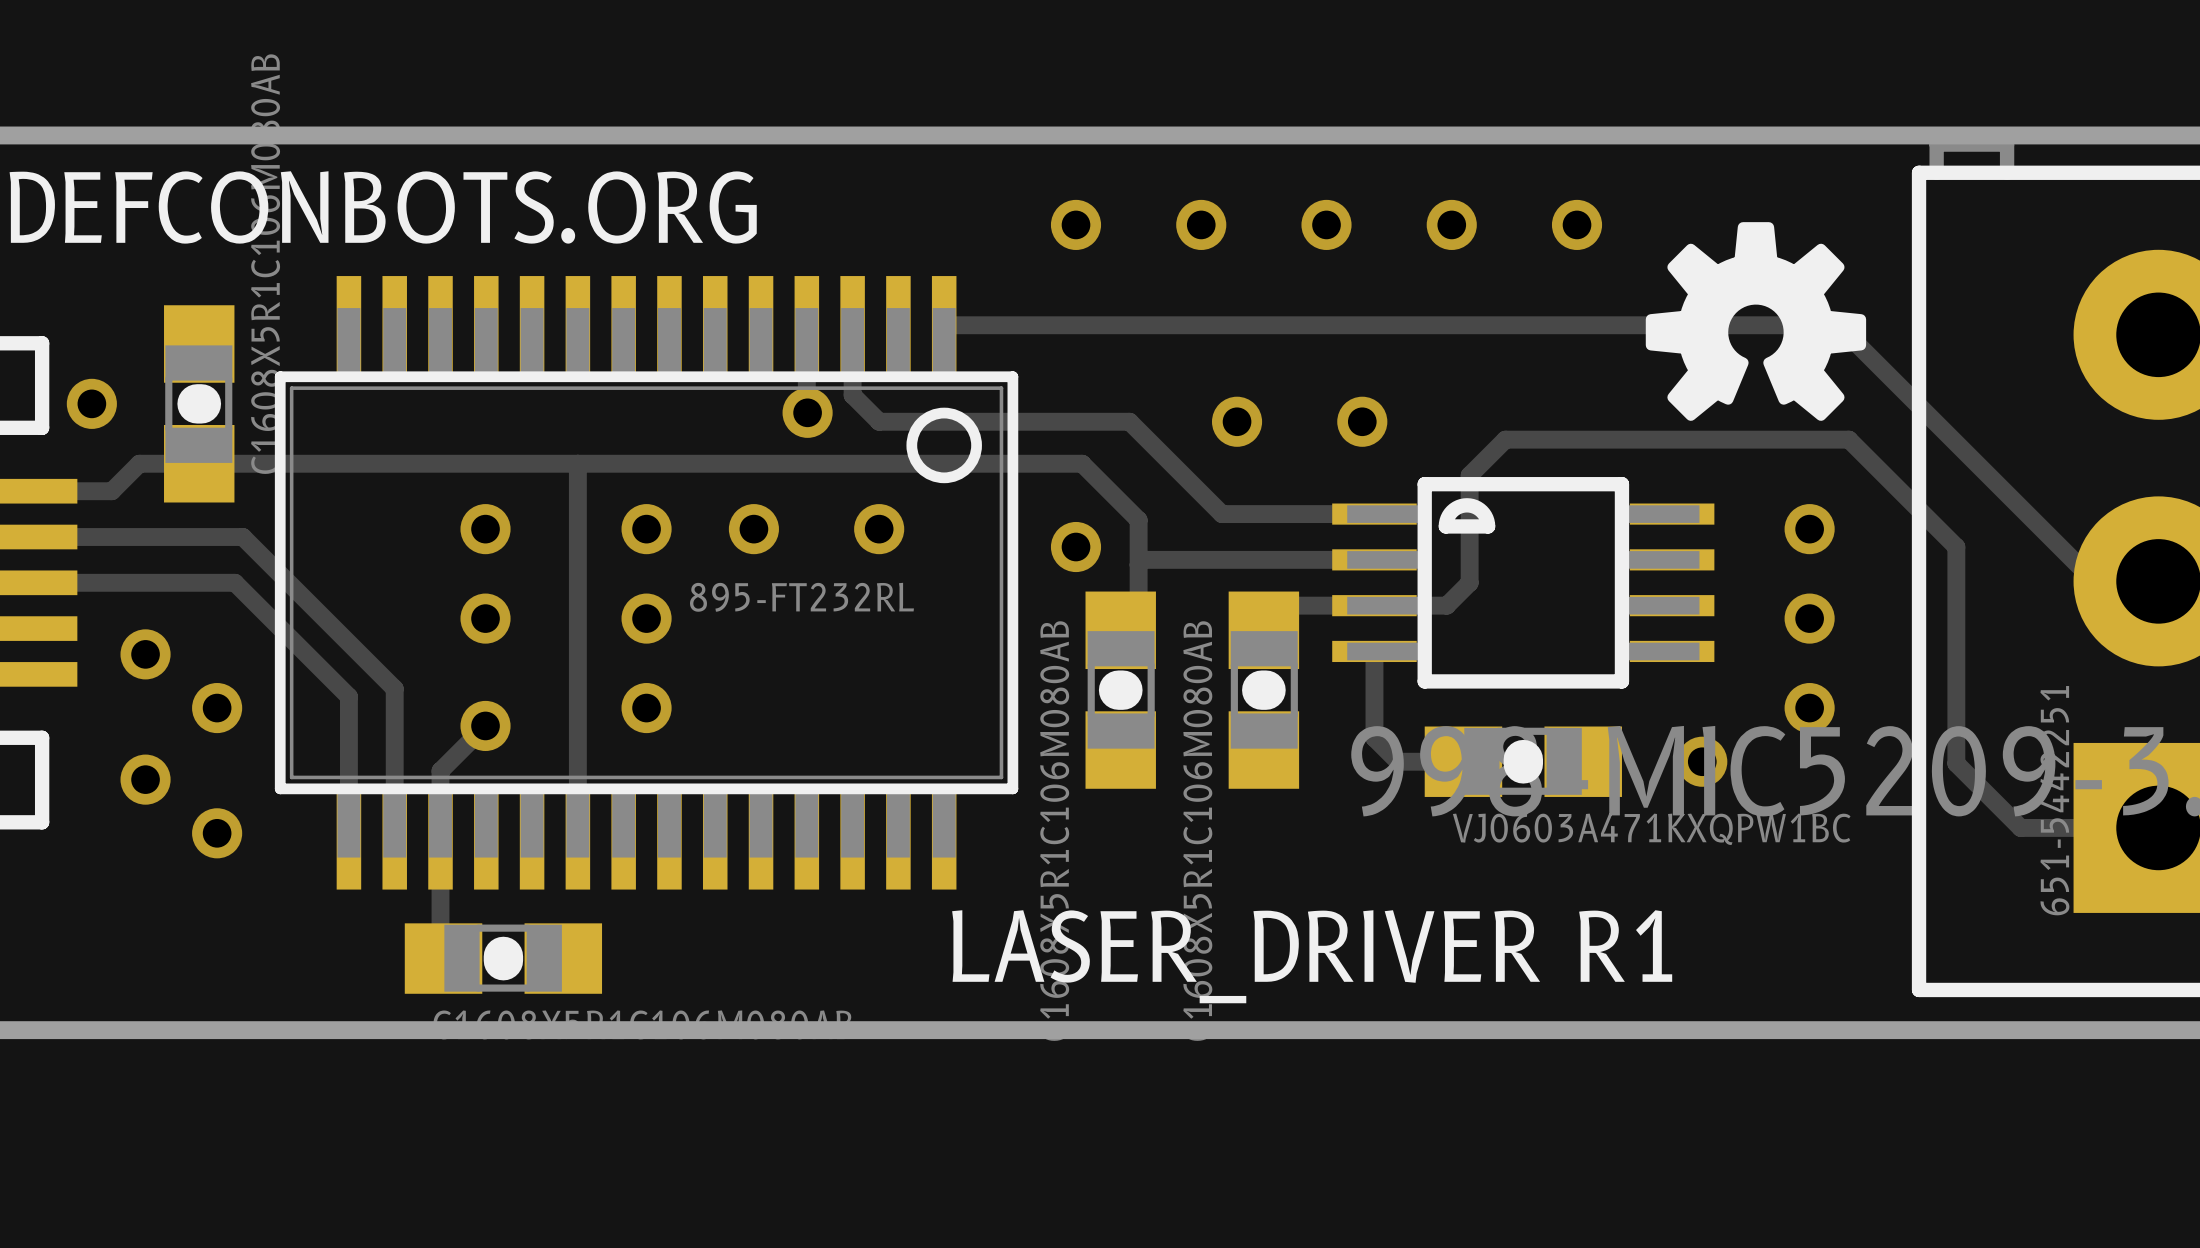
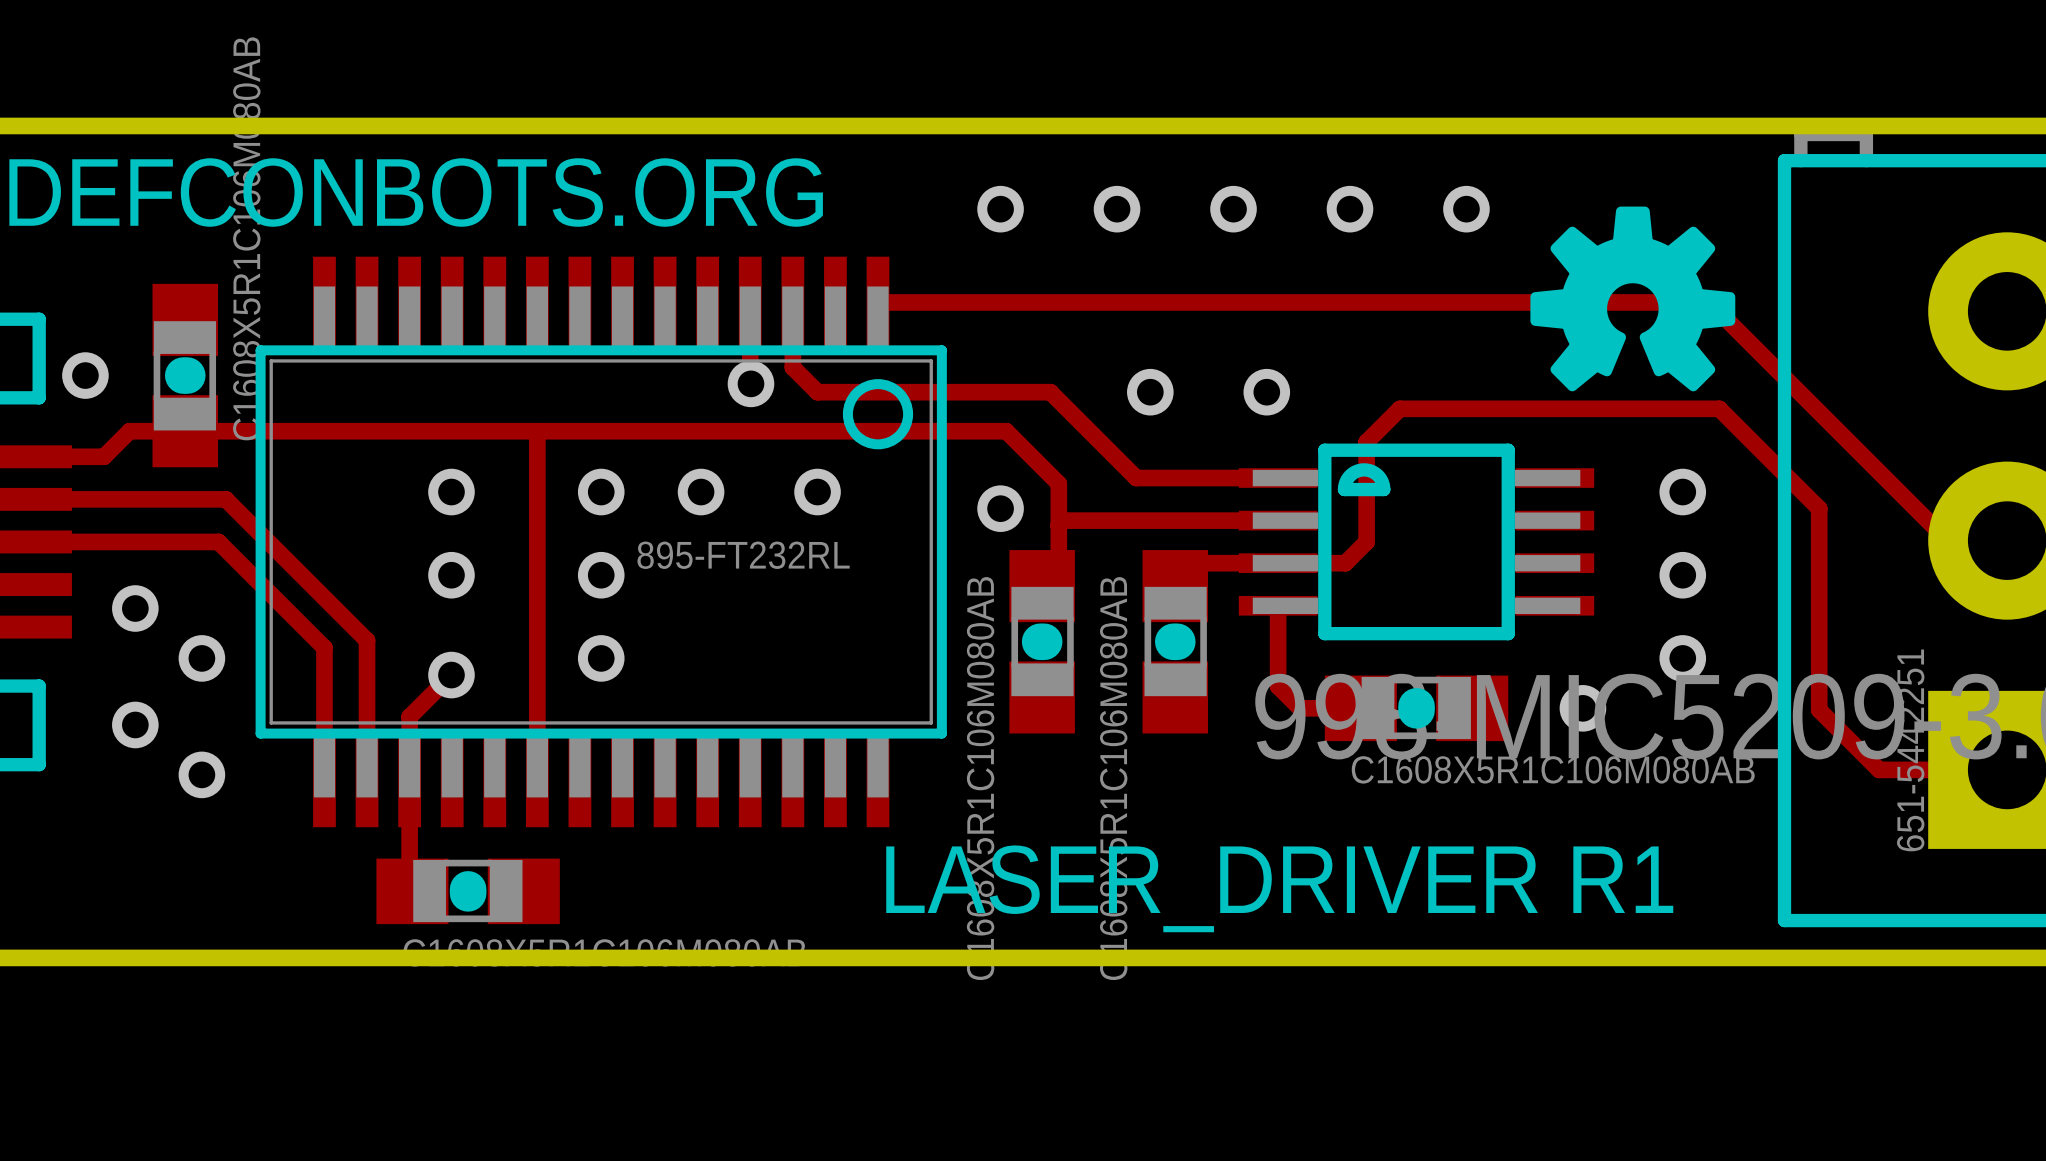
part value: VJ0603A471KXQPW1BC (1651, 829) -> C1608X5R1C106M080AB (1553, 769)

